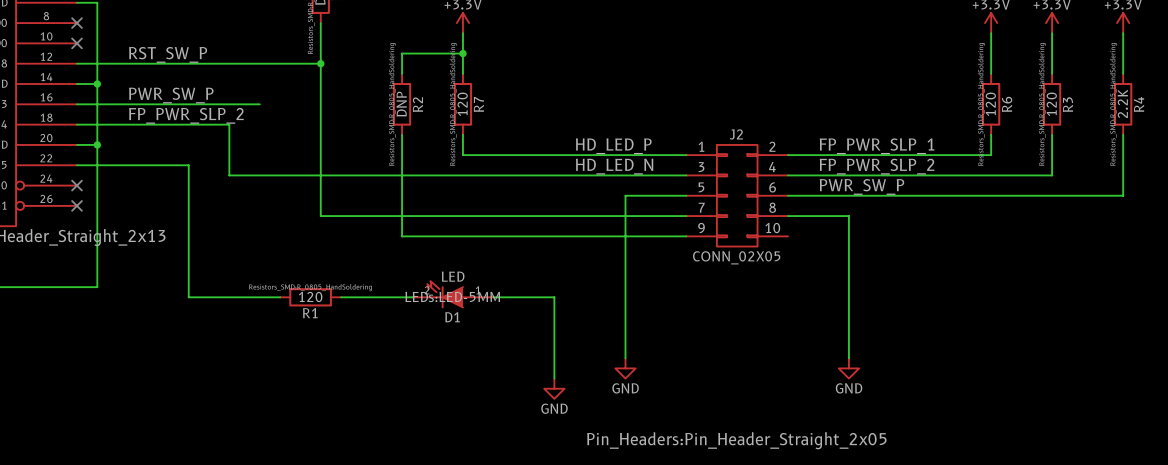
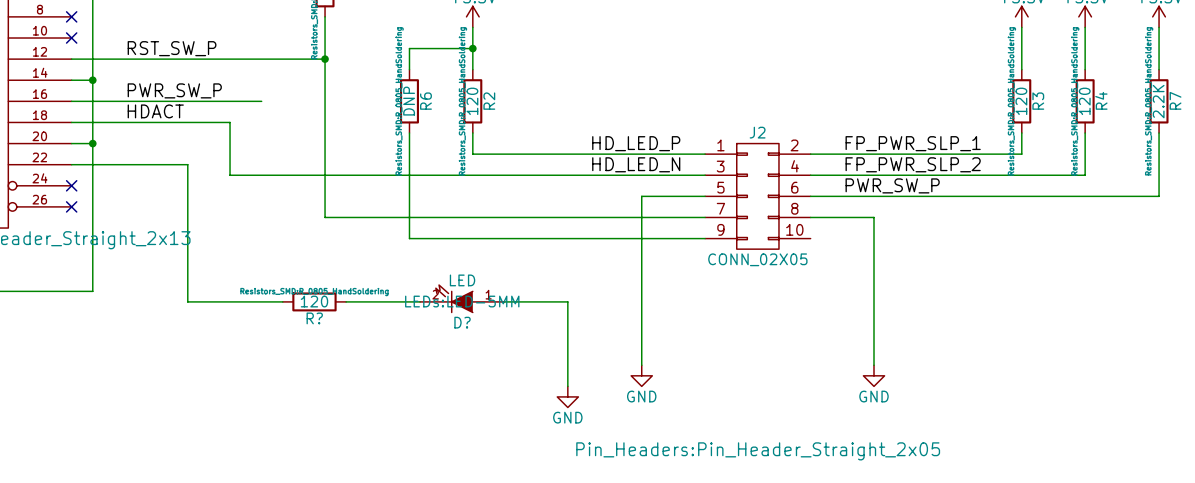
R2 name: R2 (417, 104) -> R6 (425, 101)
R7 name: R7 (478, 104) -> R2 (489, 101)
R6 name: R6 (1007, 104) -> R3 (1038, 101)
R3 name: R3 (1067, 104) -> R4 (1101, 100)
R4 name: R4 (1139, 104) -> R7 (1175, 100)
label: FP_PWR_SLP_2 (186, 115) -> HDACT (155, 111)
R1 name: R1 (310, 313) -> R? (314, 318)
D1 name: D1 (452, 317) -> D? (462, 322)

